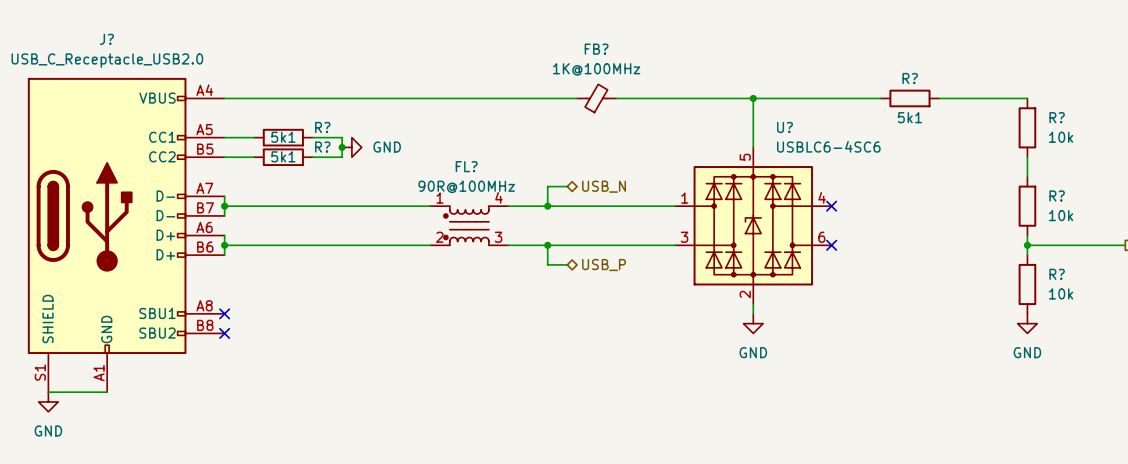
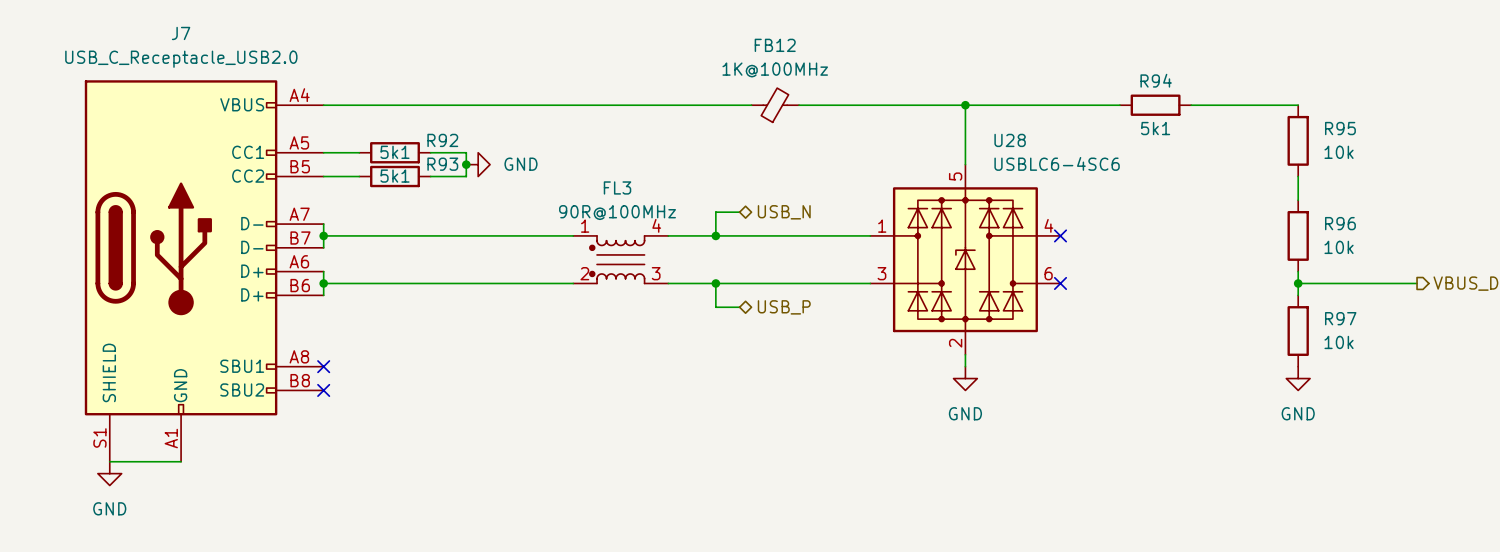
J? name: J? (106, 39) -> J7 (181, 33)
FB? name: FB? (596, 49) -> FB12 (775, 45)
R? name: R? (910, 78) -> R94 (1156, 80)
R? name: R? (1057, 117) -> R95 (1340, 128)
R? name: R? (322, 127) -> R92 (442, 140)
U? name: U? (784, 127) -> U28 (1010, 140)
R? name: R? (322, 147) -> R93 (442, 164)
FL? name: FL? (466, 166) -> FL3 (617, 187)
R? name: R? (1057, 196) -> R96 (1340, 223)
R? name: R? (1057, 274) -> R97 (1340, 318)

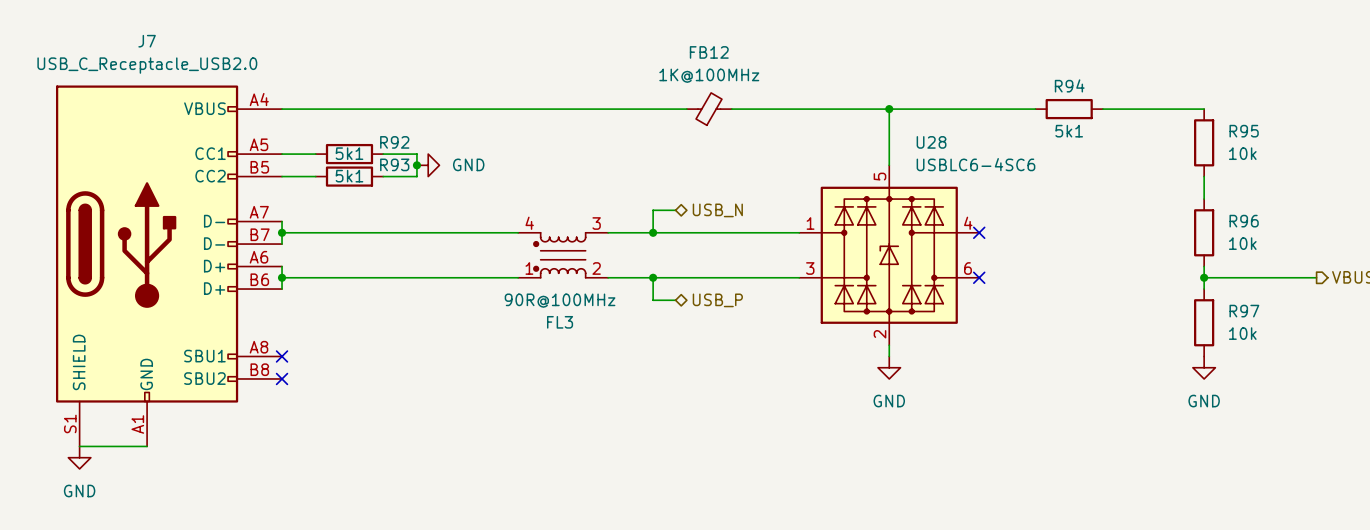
FL3 name position: FL3 (617, 187) -> FL3 (560, 322)
FL3 value position: 90R@100MHz (617, 212) -> 90R@100MHz (560, 300)
FL3 pin number: 4 (656, 225) -> 3 (596, 223)
FL3 pin number: 1 (585, 226) -> 4 (529, 223)
FL3 pin number: 2 (584, 273) -> 1 (529, 268)
FL3 pin number: 3 (656, 273) -> 2 (596, 268)

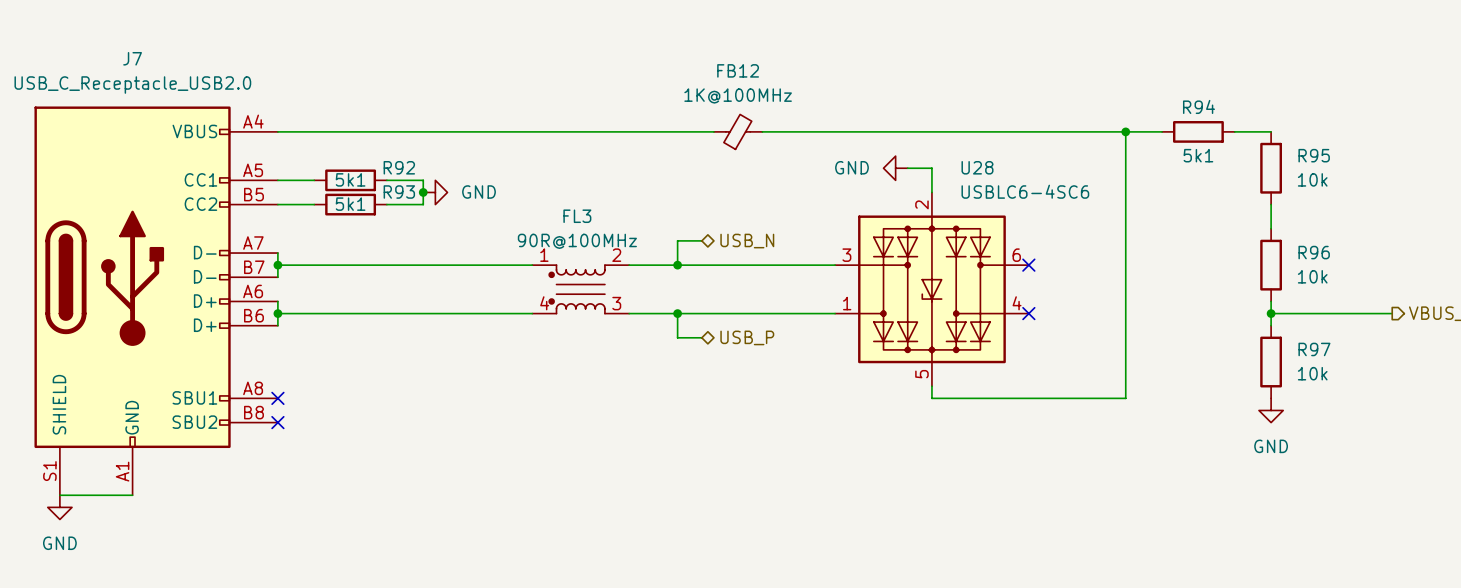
wire: (889, 109) (889, 142) -> (907, 168) (931, 168)
junction: (889, 109) -> none
wire: none -> (1125, 131) (1125, 398) (931, 398)
junction: none -> (1125, 131)
R94 position: (1069, 109) -> (1198, 131)
wire: (1102, 109) (1170, 109) -> (1162, 131) (1089, 131)
power symbol: none -> GND (895, 168)
FL3 flip: as is (559, 255) -> up-down (577, 289)
U28 flip: as is (889, 255) -> up-down (931, 289)
power symbol: GND (889, 367) -> none

